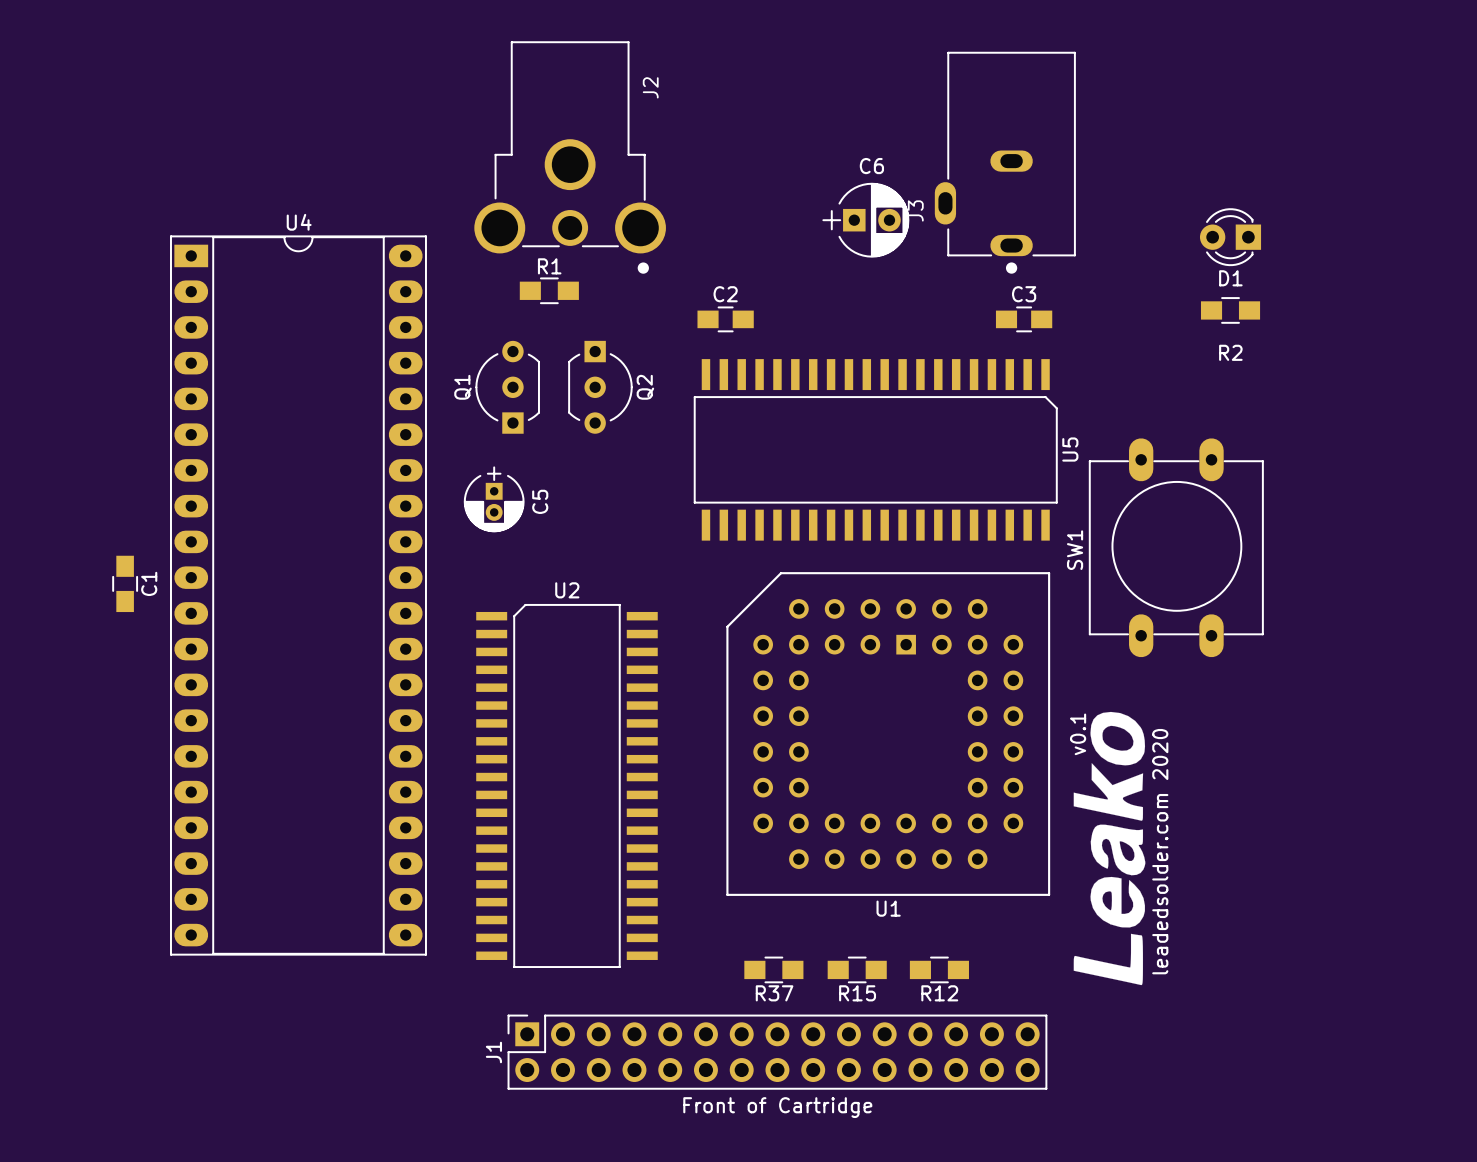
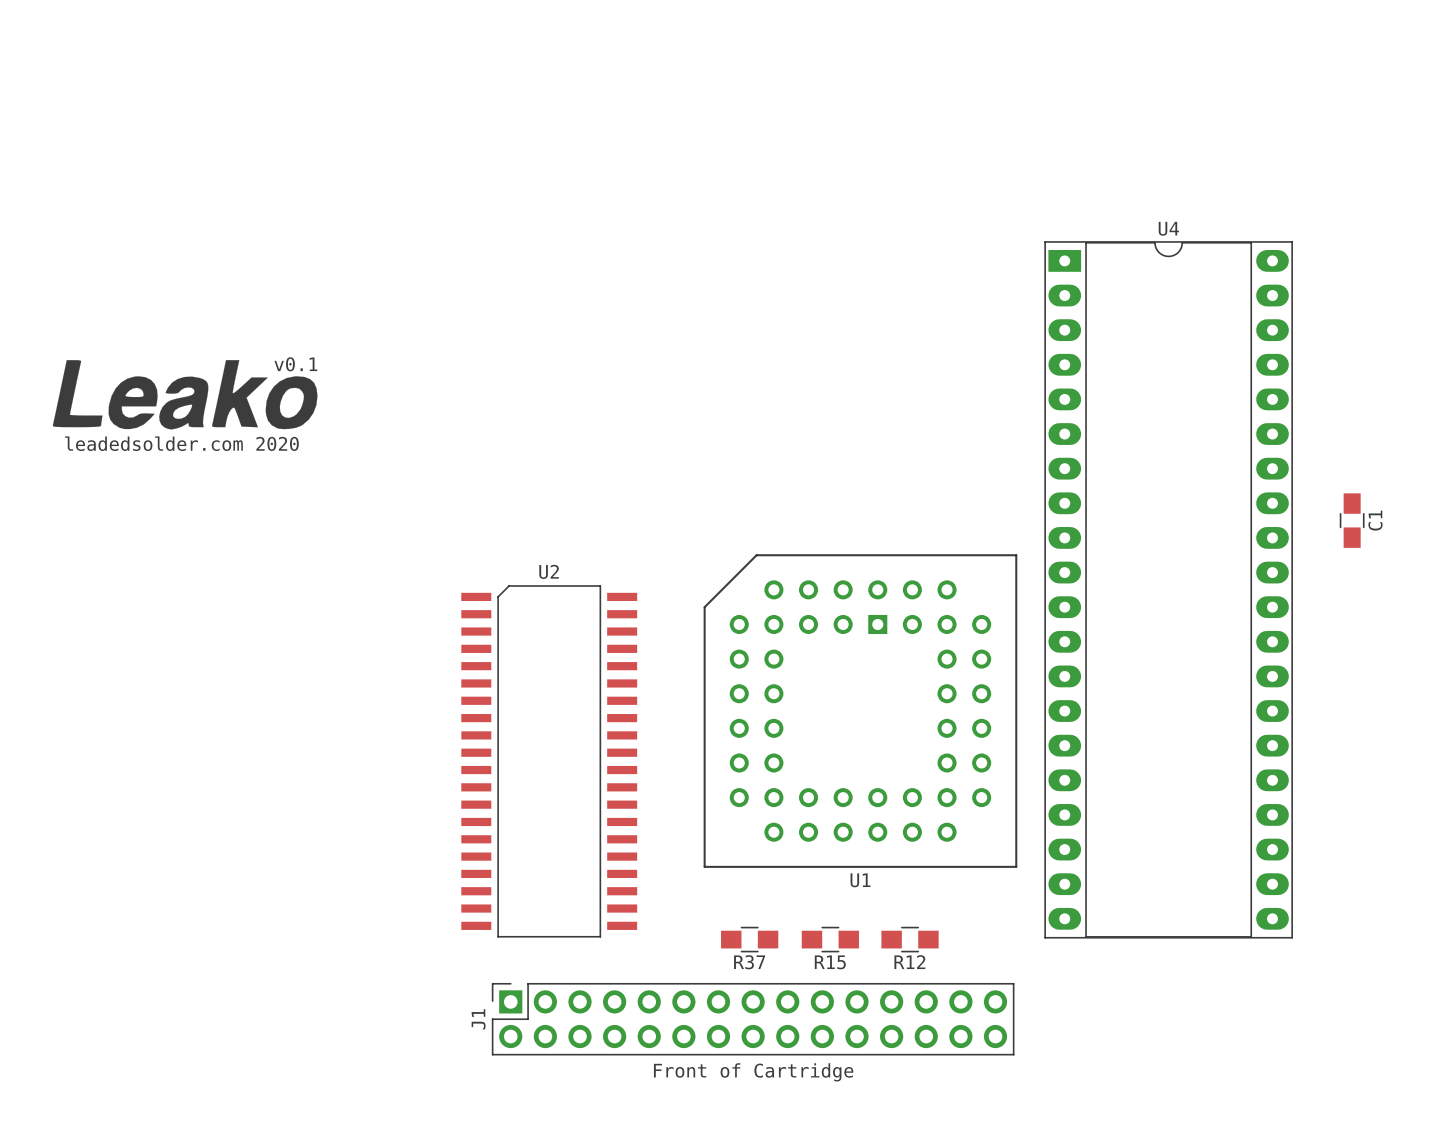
J2: (570, 157) -> none
J3: (1005, 162) -> none
C6: (865, 220) -> none
D1: (1230, 237) -> none
R1: (549, 290) -> none
R2: (1230, 310) -> none
C2: (725, 319) -> none
C3: (1024, 319) -> none
drawing: none -> [52, 360, 318, 430]
text: none -> v0.1 (295, 364)
Q1: (507, 387) -> none
Q2: (600, 387) -> none
U5: (875, 449) -> none
text: none -> leadedsolder.com 2020 (181, 443)
C5: (494, 499) -> none
SW1: (1176, 547) -> none
C1 position: (125, 583) -> (1352, 520)
U4 position: (298, 595) -> (1168, 589)
drawing: [1073, 711, 1146, 986] -> none
text: v0.1 (1078, 734) -> none
text: leadedsolder.com 2020 (1160, 851) -> none

